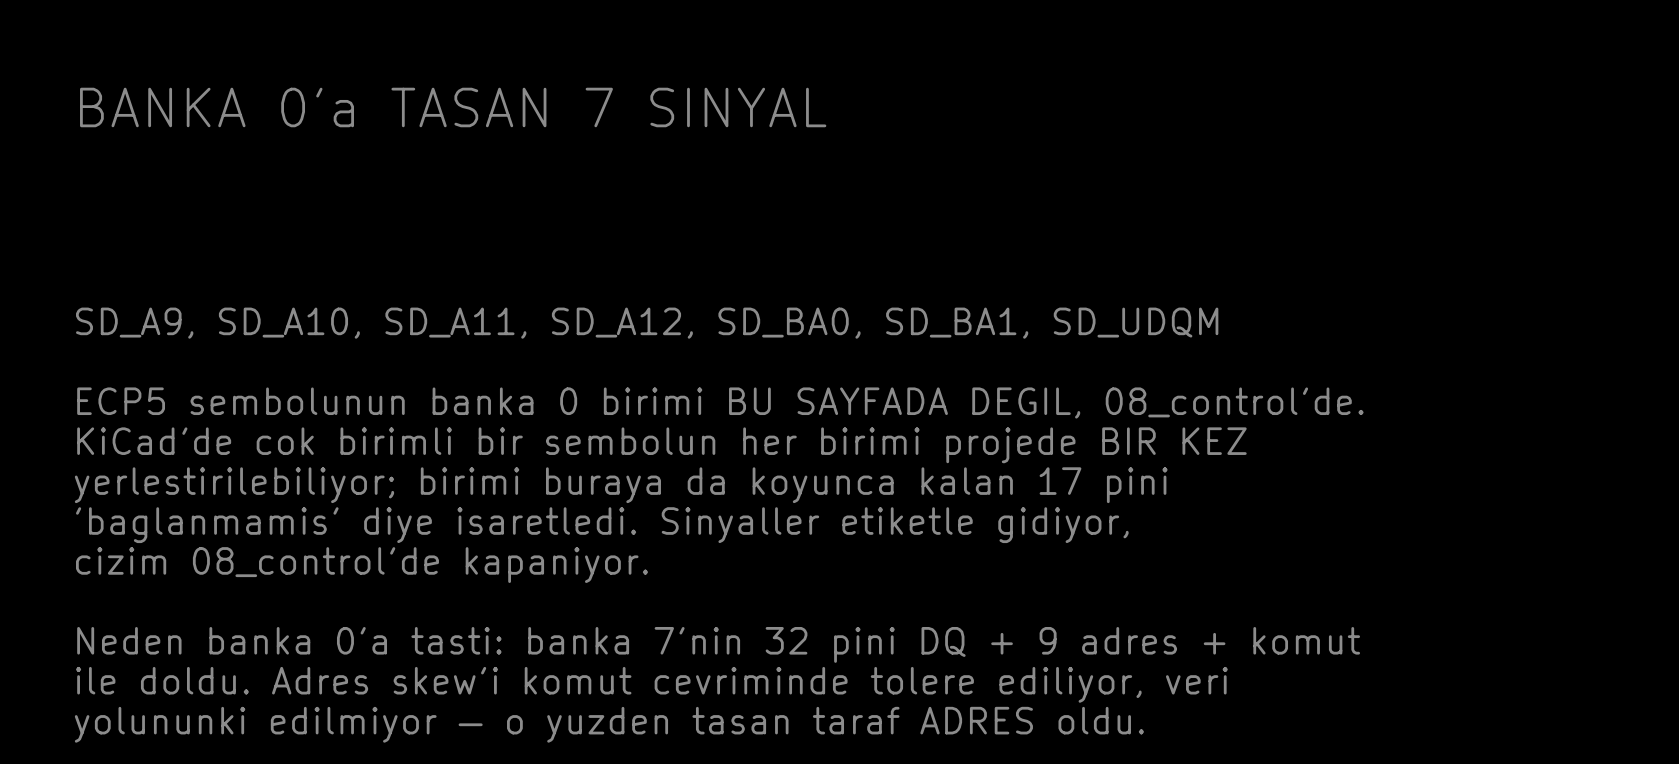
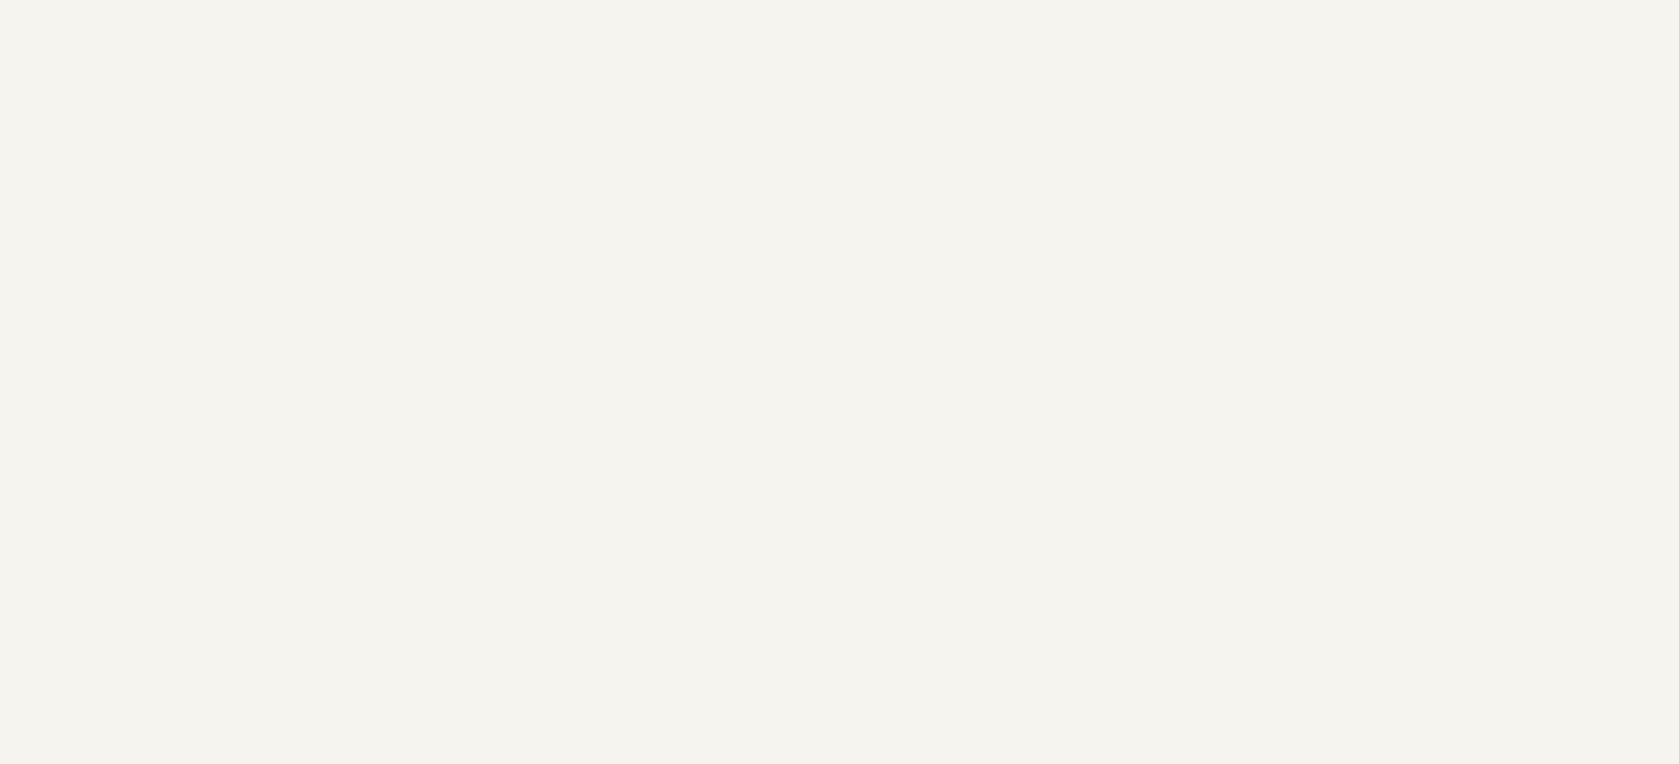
text: BANKA 0'a TASAN 7 SINYAL (453, 107) -> none
text: SD_A9, SD_A10, SD_A11, SD_A12, SD_BA0, SD_BA1, SD_UDQM (647, 323) -> none
text: ECP5 sembolunun banka 0 birimi BU SAYFADA DEGIL, 08_control'de. (720, 403) -> none
text: KiCad'de cok birimli bir sembolun her birimi projede BIR KEZ (661, 445) -> none
text: yerlestirilebiliyor; birimi buraya da koyunca kalan 17 pini (621, 485) -> none
text: 'baglanmamis' diye isaretledi. Sinyaller etiketle gidiyor, (602, 525) -> none
text: cizim 08_control'de kapaniyor. (361, 565) -> none
text: Neden banka 0'a tasti: banka 7'nin 32 pini DQ + 9 adres + komut (718, 644) -> none
text: ile doldu. Adres skew'i komut cevriminde tolere ediliyor, veri (651, 684) -> none
text: yolununki edilmiyor — o yuzden tasan taraf ADRES oldu. (609, 724) -> none

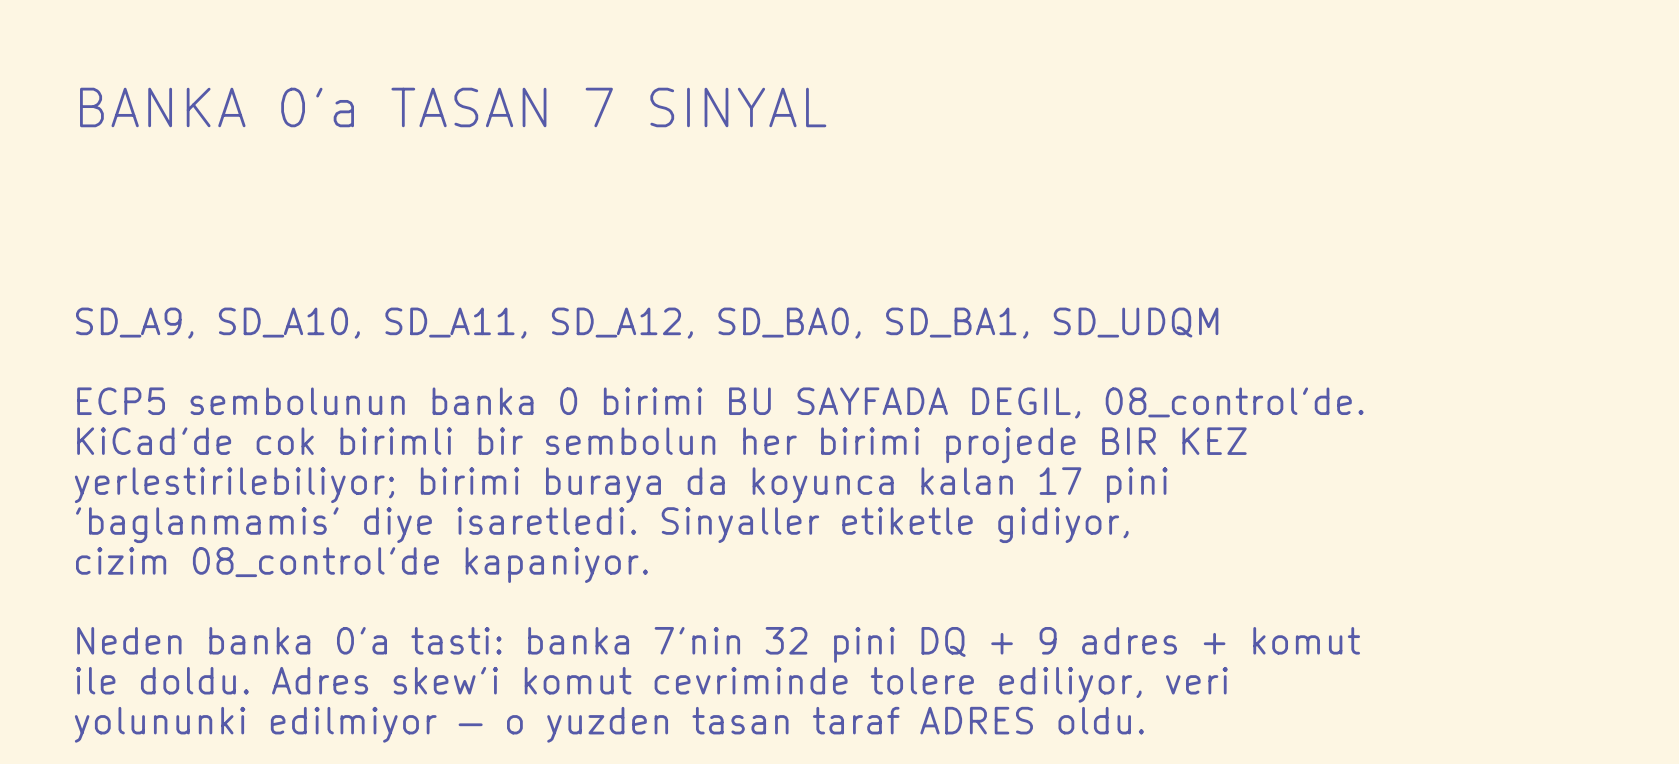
text: none -> BANKA 0'a TASAN 7 SINYAL (453, 107)
text: none -> SD_A9, SD_A10, SD_A11, SD_A12, SD_BA0, SD_BA1, SD_UDQM (647, 323)
text: none -> ECP5 sembolunun banka 0 birimi BU SAYFADA DEGIL, 08_control'de. (720, 403)
text: none -> KiCad'de cok birimli bir sembolun her birimi projede BIR KEZ (661, 445)
text: none -> yerlestirilebiliyor; birimi buraya da koyunca kalan 17 pini (621, 485)
text: none -> 'baglanmamis' diye isaretledi. Sinyaller etiketle gidiyor, (602, 525)
text: none -> cizim 08_control'de kapaniyor. (361, 565)
text: none -> Neden banka 0'a tasti: banka 7'nin 32 pini DQ + 9 adres + komut (718, 644)
text: none -> ile doldu. Adres skew'i komut cevriminde tolere ediliyor, veri (651, 684)
text: none -> yolununki edilmiyor — o yuzden tasan taraf ADRES oldu. (609, 724)

